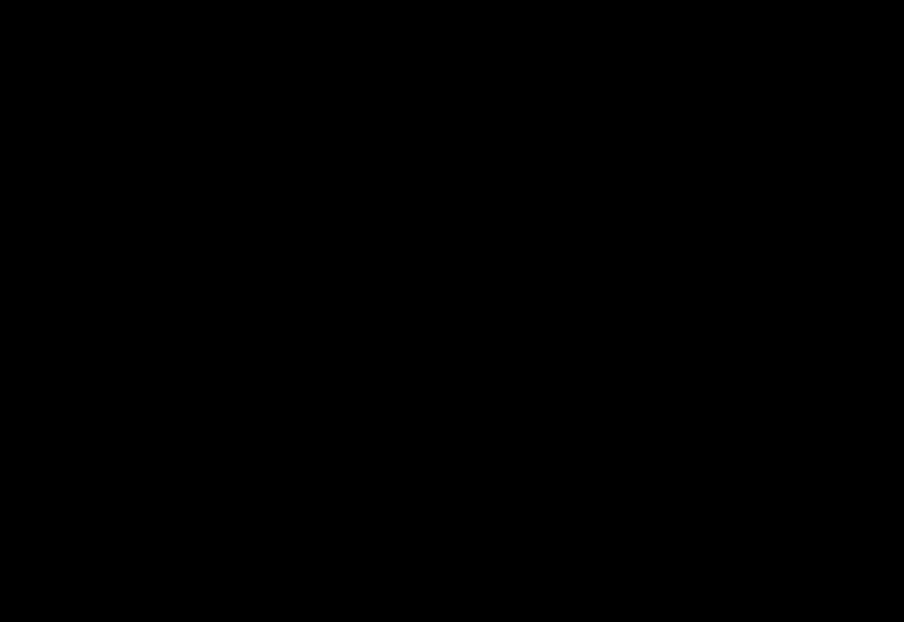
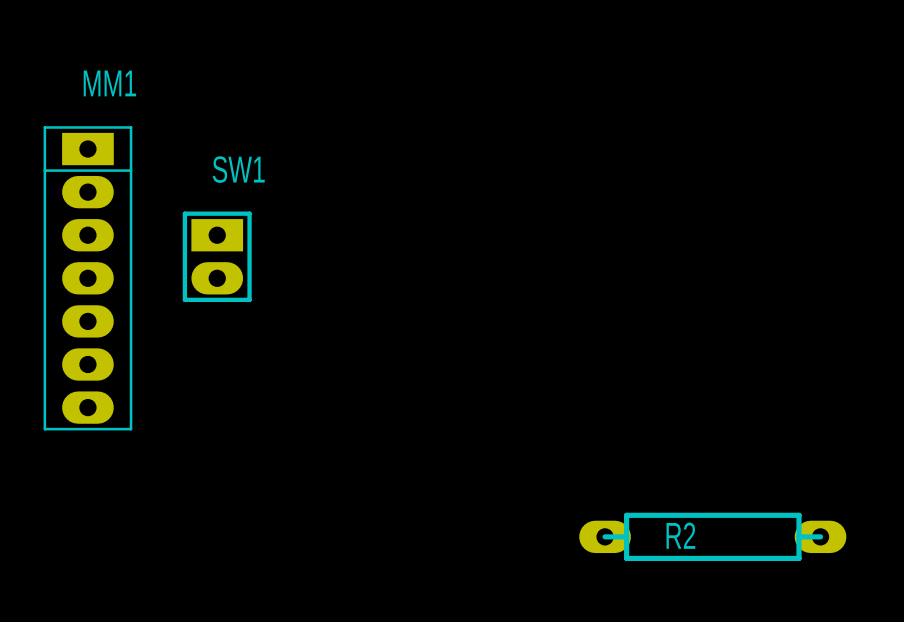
SW1: none -> (217, 256)
MM1: none -> (87, 278)
R2: none -> (712, 536)

